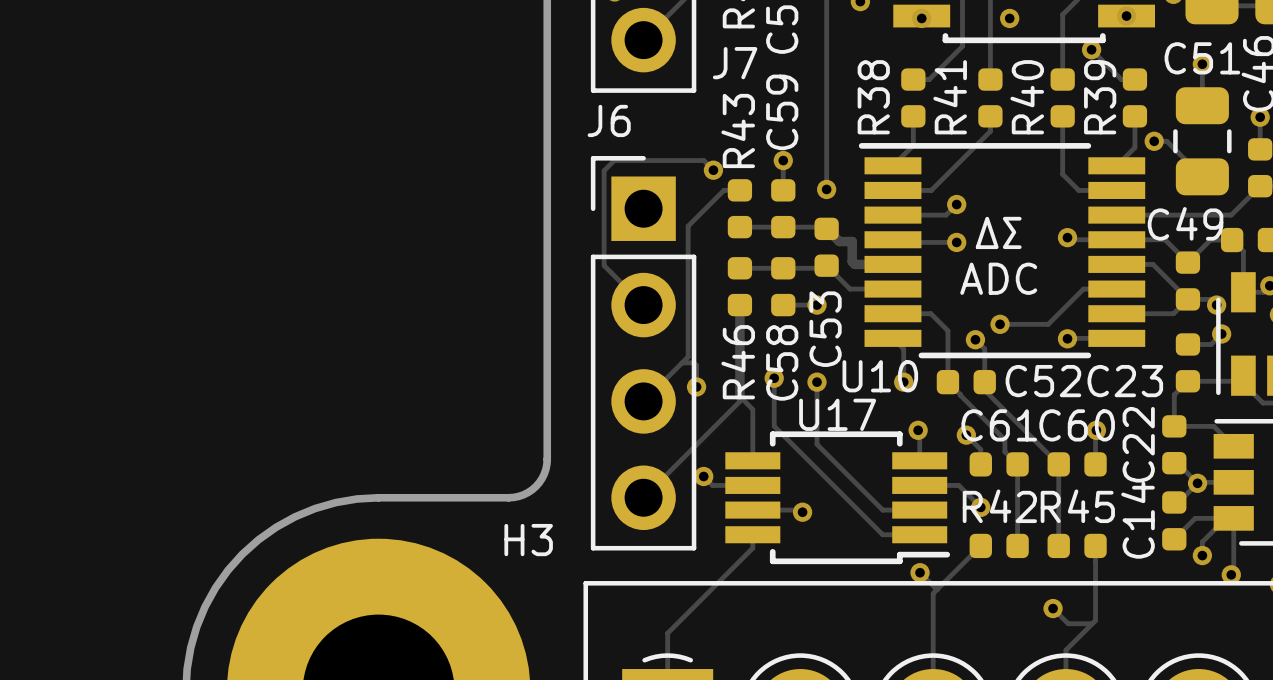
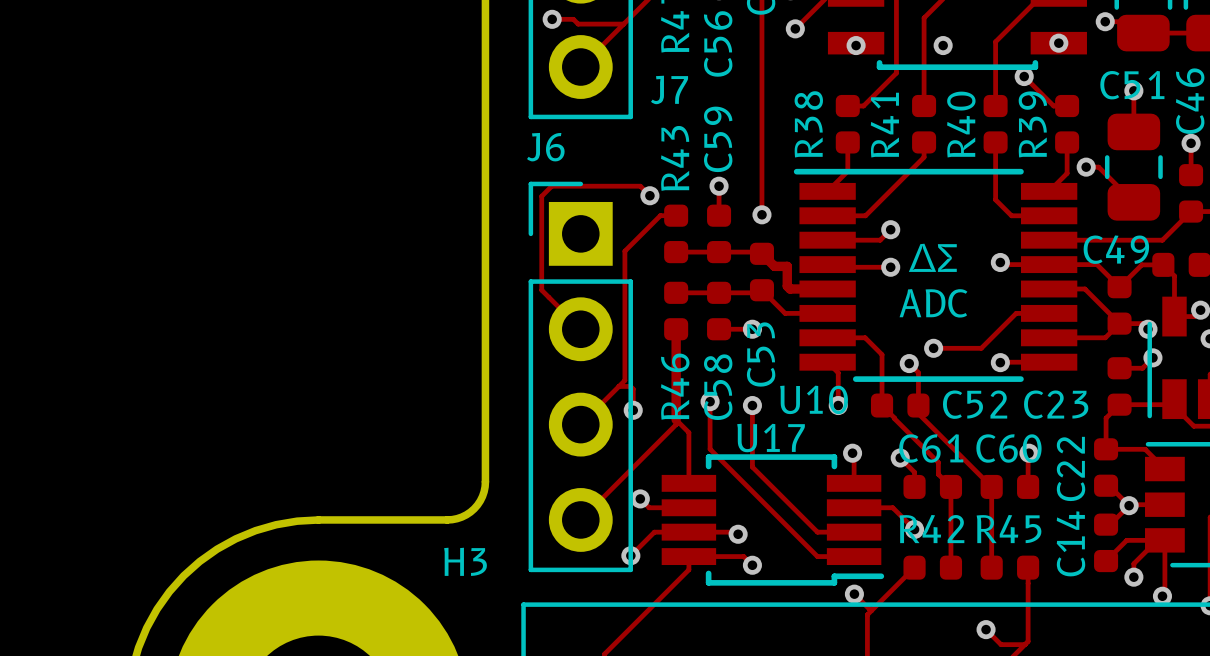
track: none -> (688, 532) (654, 532) (630, 555)
via: none -> (630, 555)
track: none -> (688, 556) (743, 556) (752, 565)
via: none -> (752, 565)

